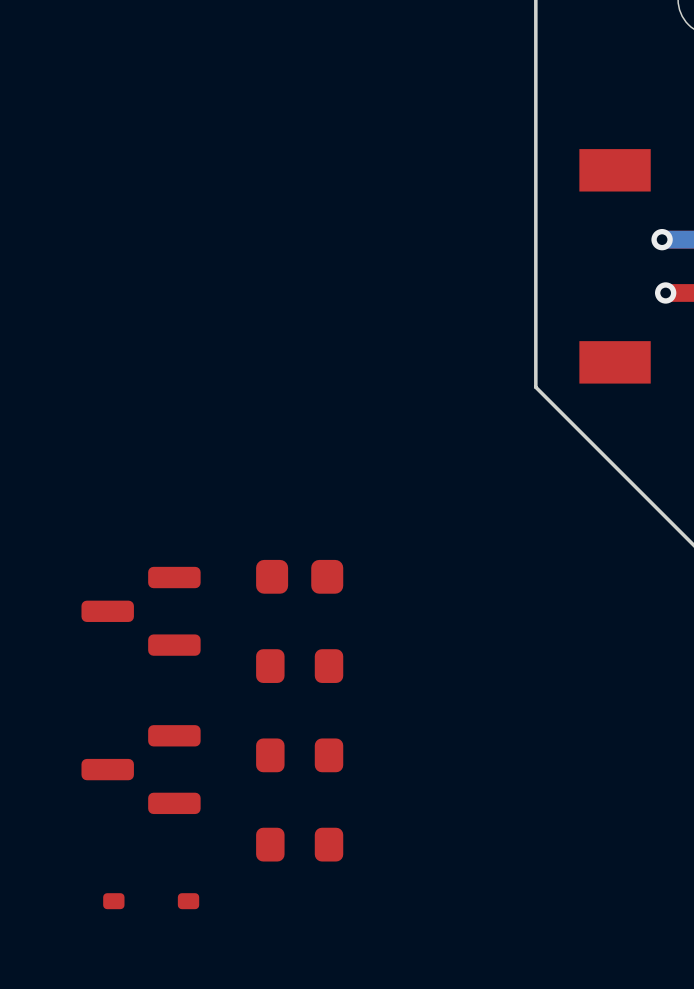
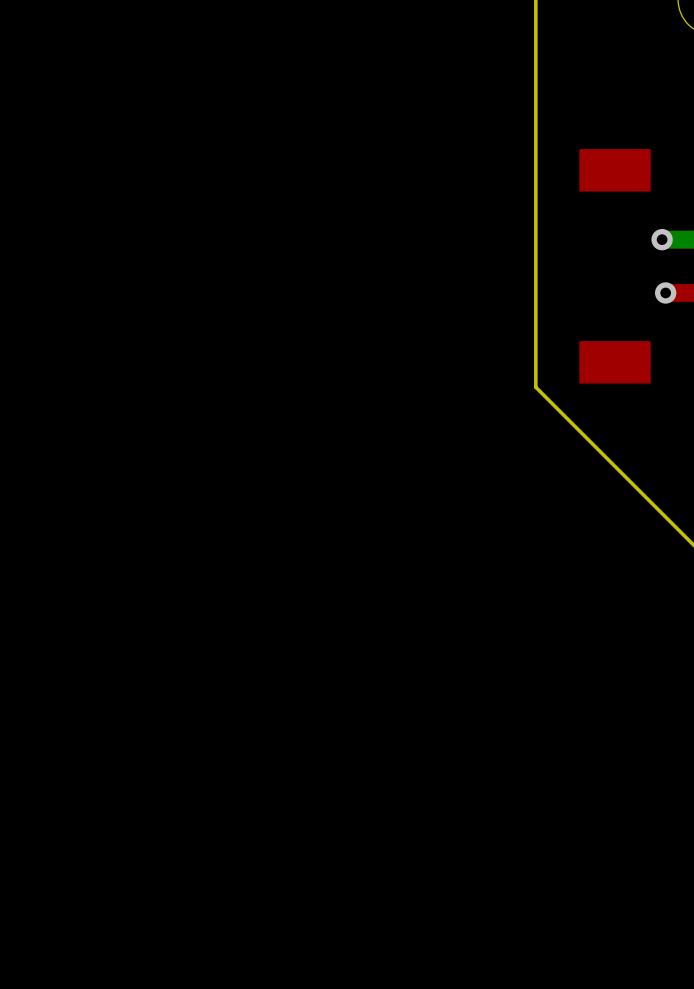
part: (299, 576) -> none
part: (141, 611) -> none
part: (299, 666) -> none
part: (299, 755) -> none
part: (141, 769) -> none
part: (299, 844) -> none
part: (151, 901) -> none

